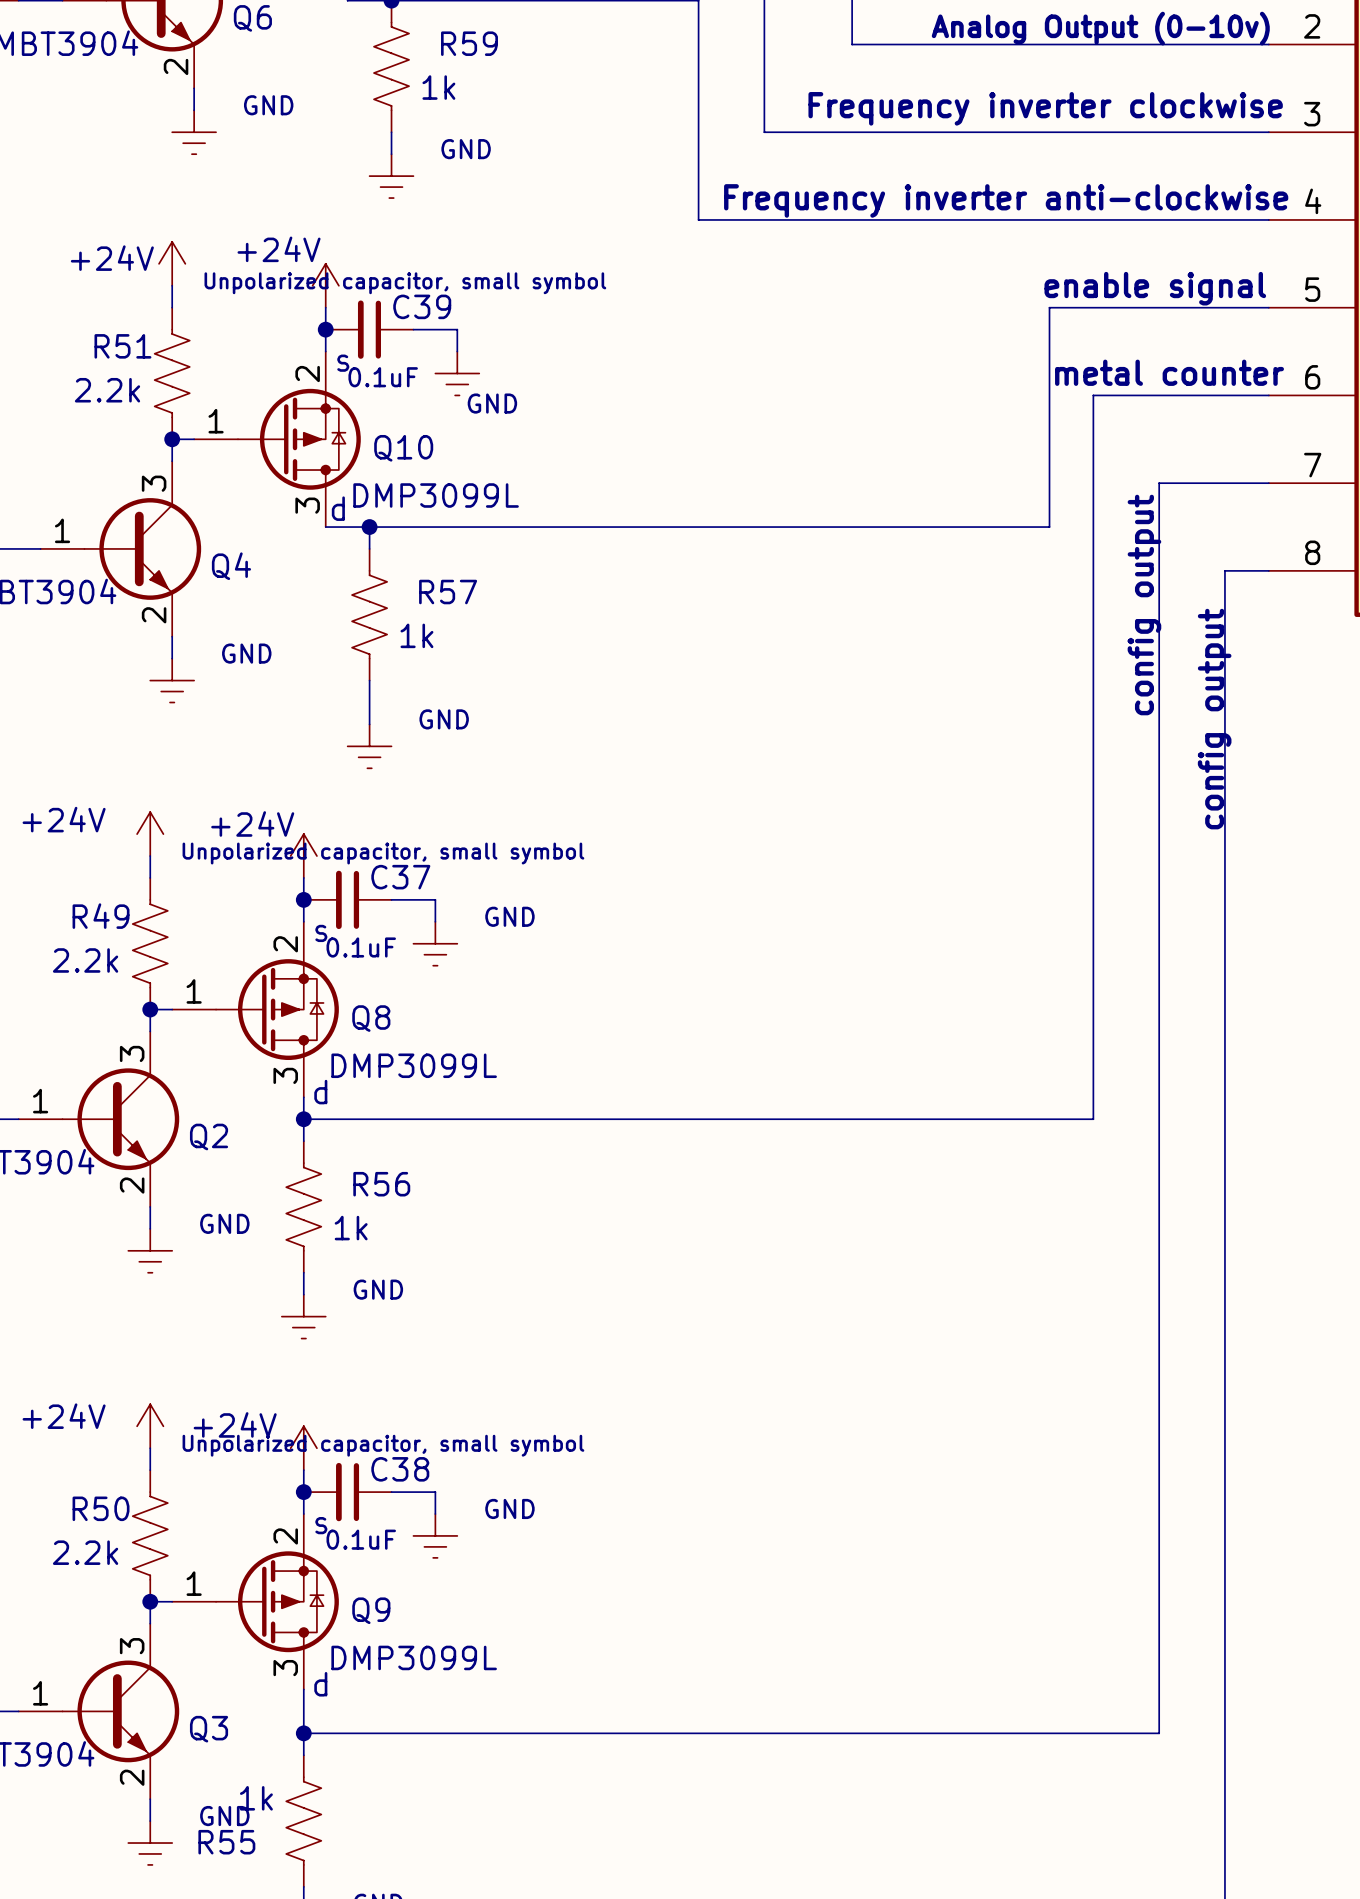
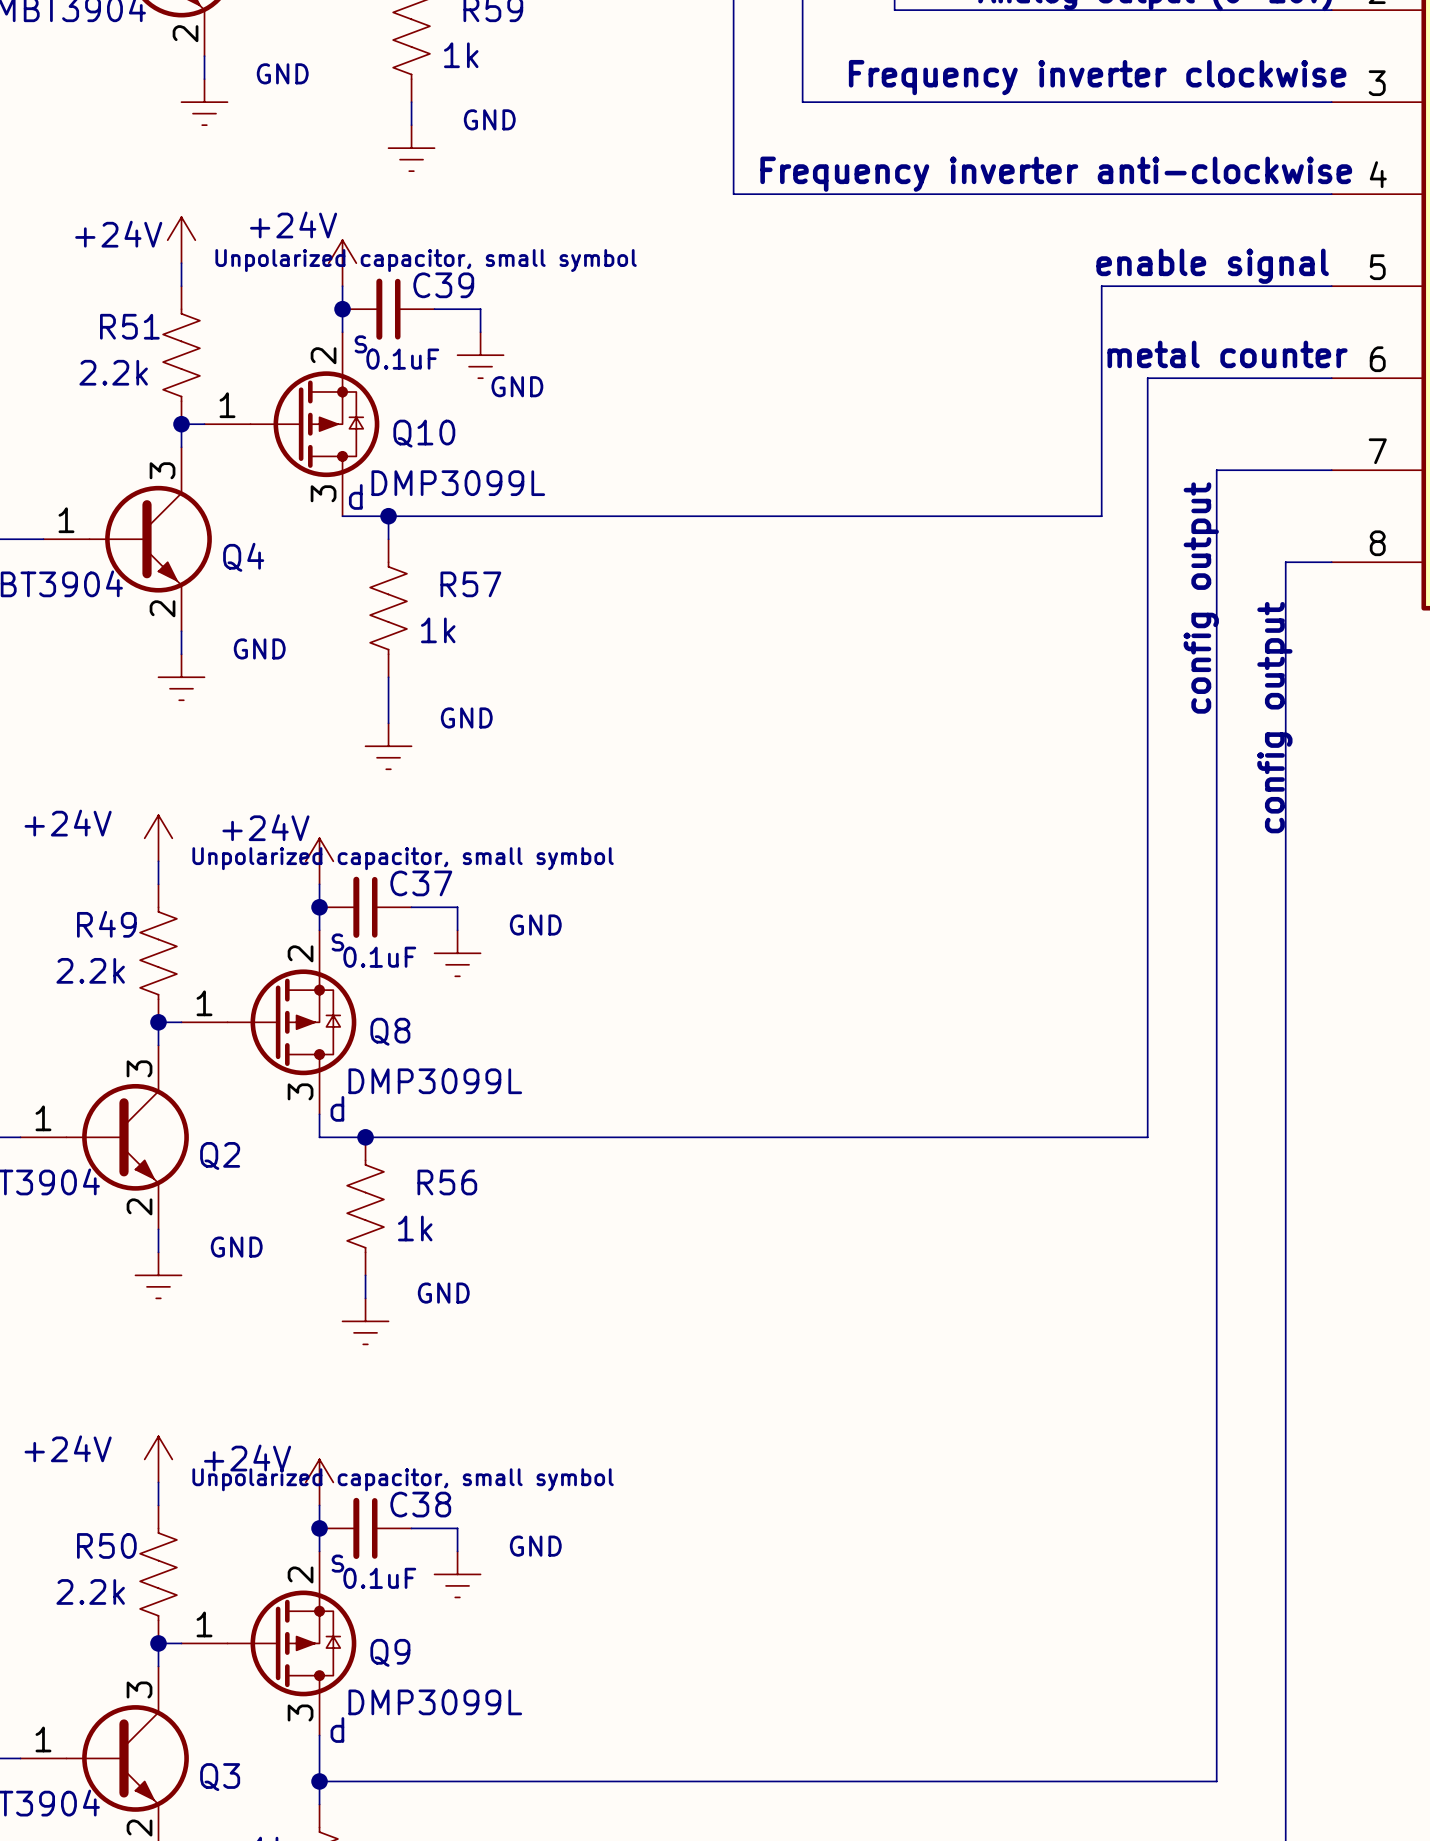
wire: (303, 1119) (303, 1141) -> none
junction position: (303, 1119) -> (365, 1137)
R56 position: (303, 1206) -> (365, 1206)
wire: (303, 1272) (303, 1294) -> (365, 1275) (365, 1298)
power symbol position: GND (303, 1316) -> GND (365, 1321)

